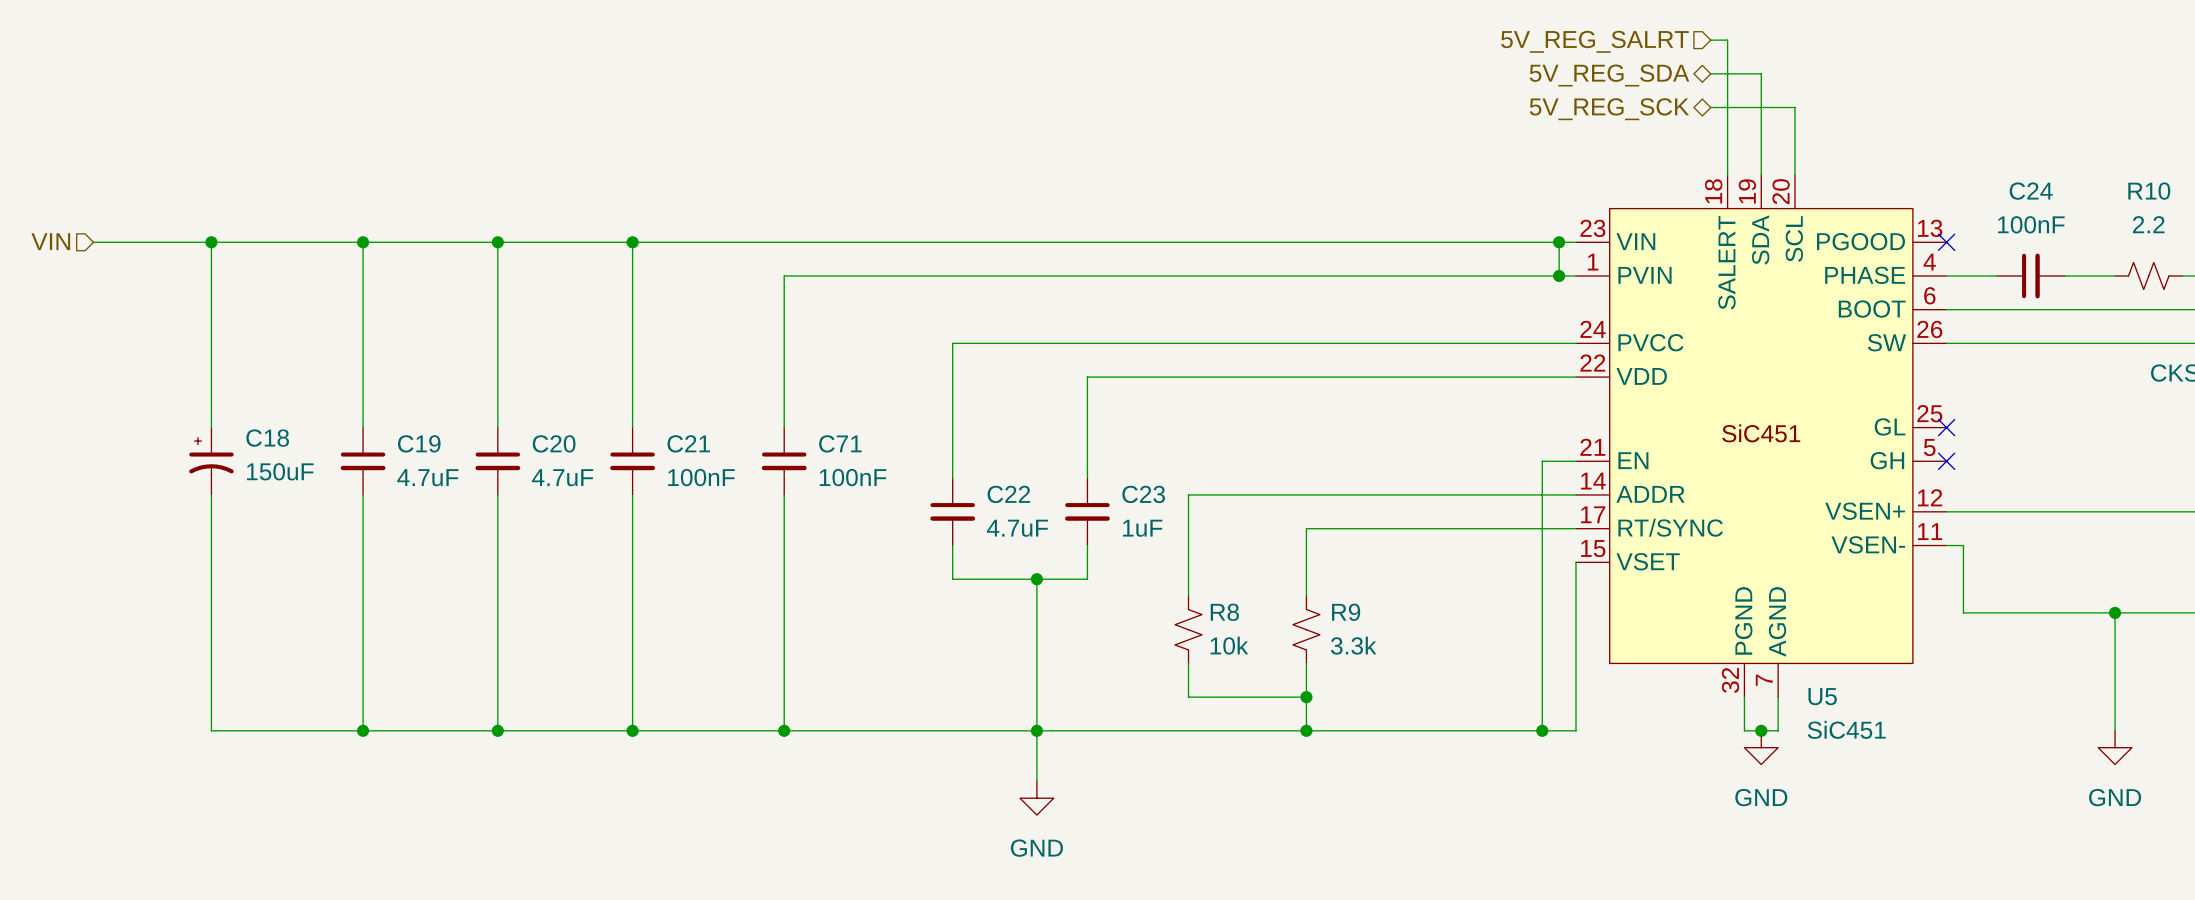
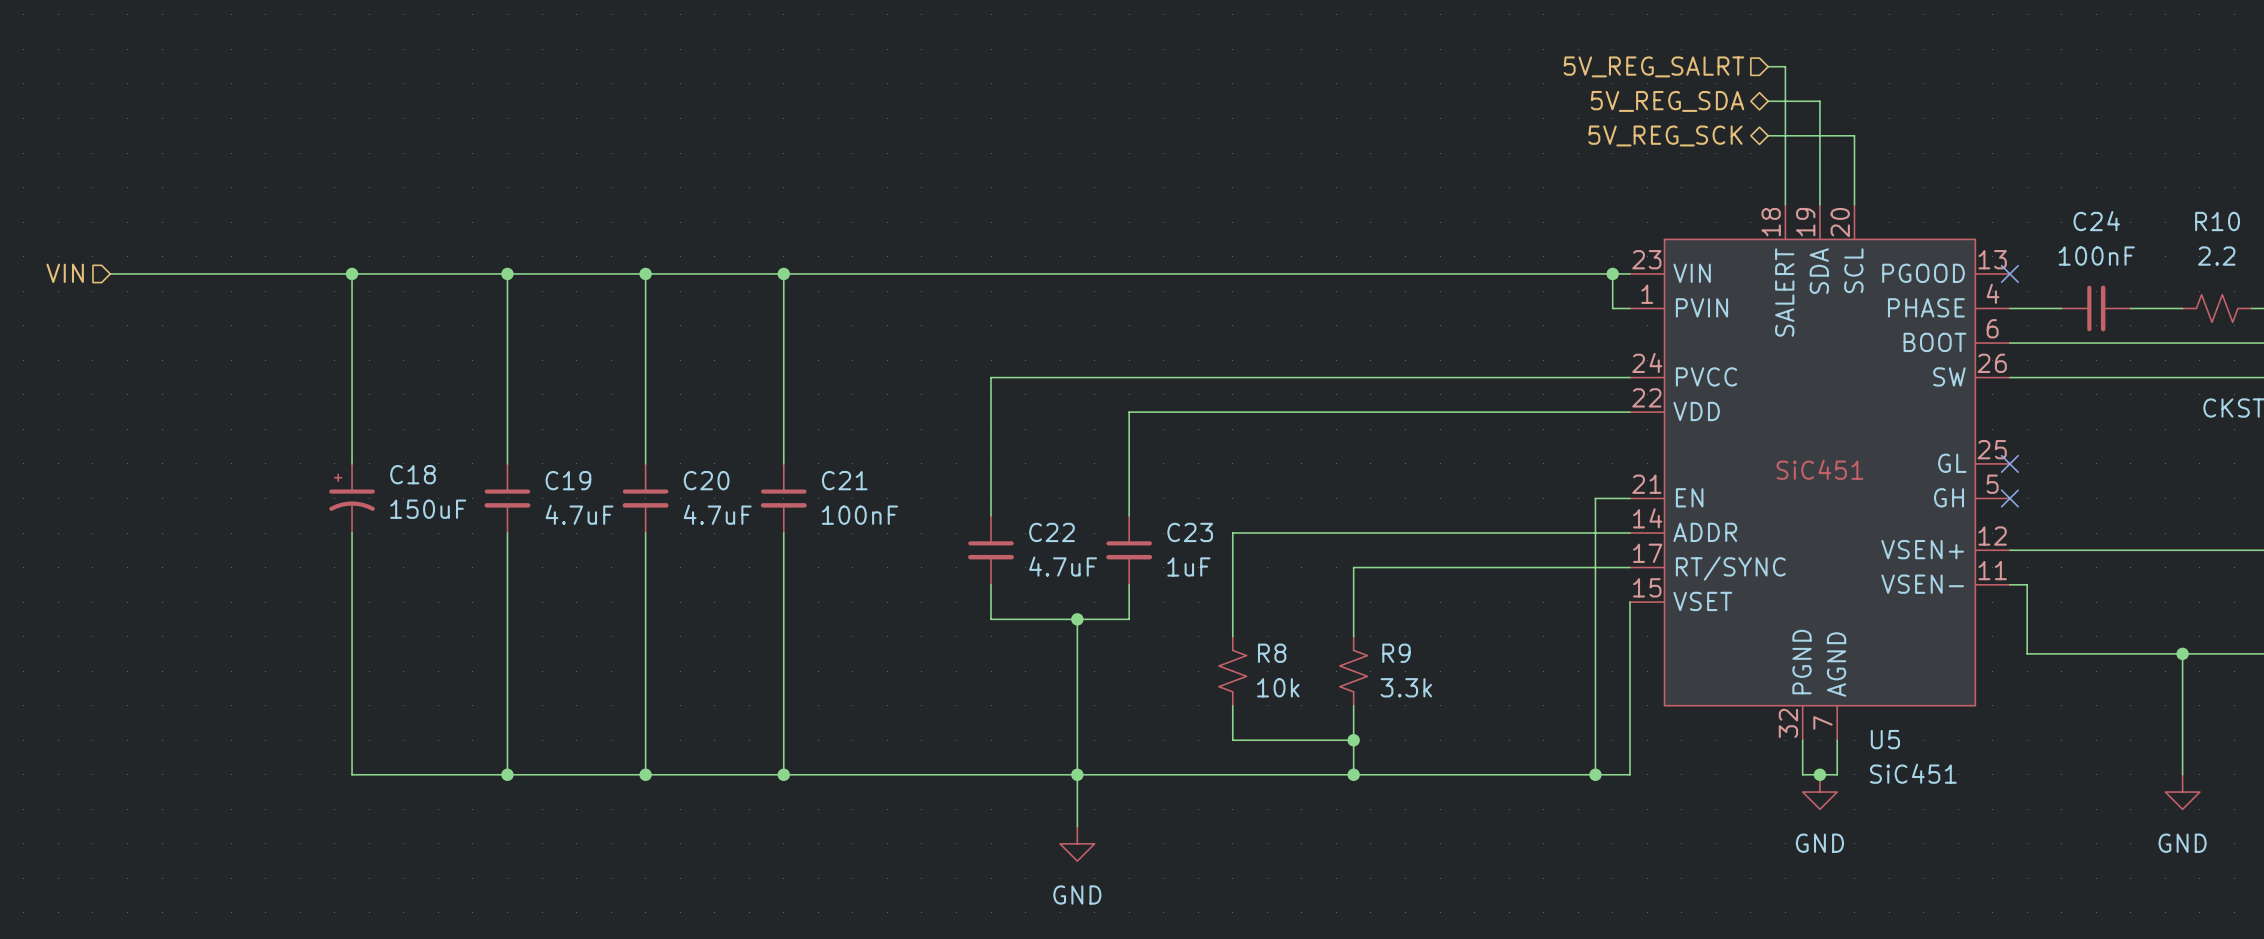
wire: (211, 242) (211, 427) -> (352, 273) (352, 463)
junction: (211, 242) -> none
wire: (363, 242) (363, 427) -> (507, 273) (507, 463)
junction position: (363, 242) -> (352, 273)
wire: (497, 242) (497, 427) -> (645, 273) (645, 463)
junction position: (497, 242) -> (507, 273)
wire: (632, 242) (632, 427) -> (783, 273) (783, 463)
junction position: (632, 242) -> (645, 273)
junction: none -> (783, 273)
wire: (1559, 275) (784, 275) (784, 427) -> none
junction: (1559, 275) -> none
C18 position: (211, 461) -> (352, 498)
C19 position: (363, 461) -> (507, 498)
C20 position: (497, 461) -> (645, 498)
C21 position: (632, 461) -> (783, 498)
C71: 100nF (784, 461) -> none
wire: (211, 494) (211, 730) (329, 730) -> (352, 533) (352, 774)
wire: (363, 494) (363, 730) -> (507, 533) (507, 774)
wire: (497, 494) (497, 730) -> (645, 533) (645, 774)
wire: (632, 494) (632, 730) -> (783, 533) (783, 774)
wire: (784, 494) (784, 730) -> none
junction: (363, 730) -> none
junction position: (497, 730) -> (507, 774)
junction position: (632, 730) -> (645, 774)
junction position: (784, 730) -> (783, 774)

